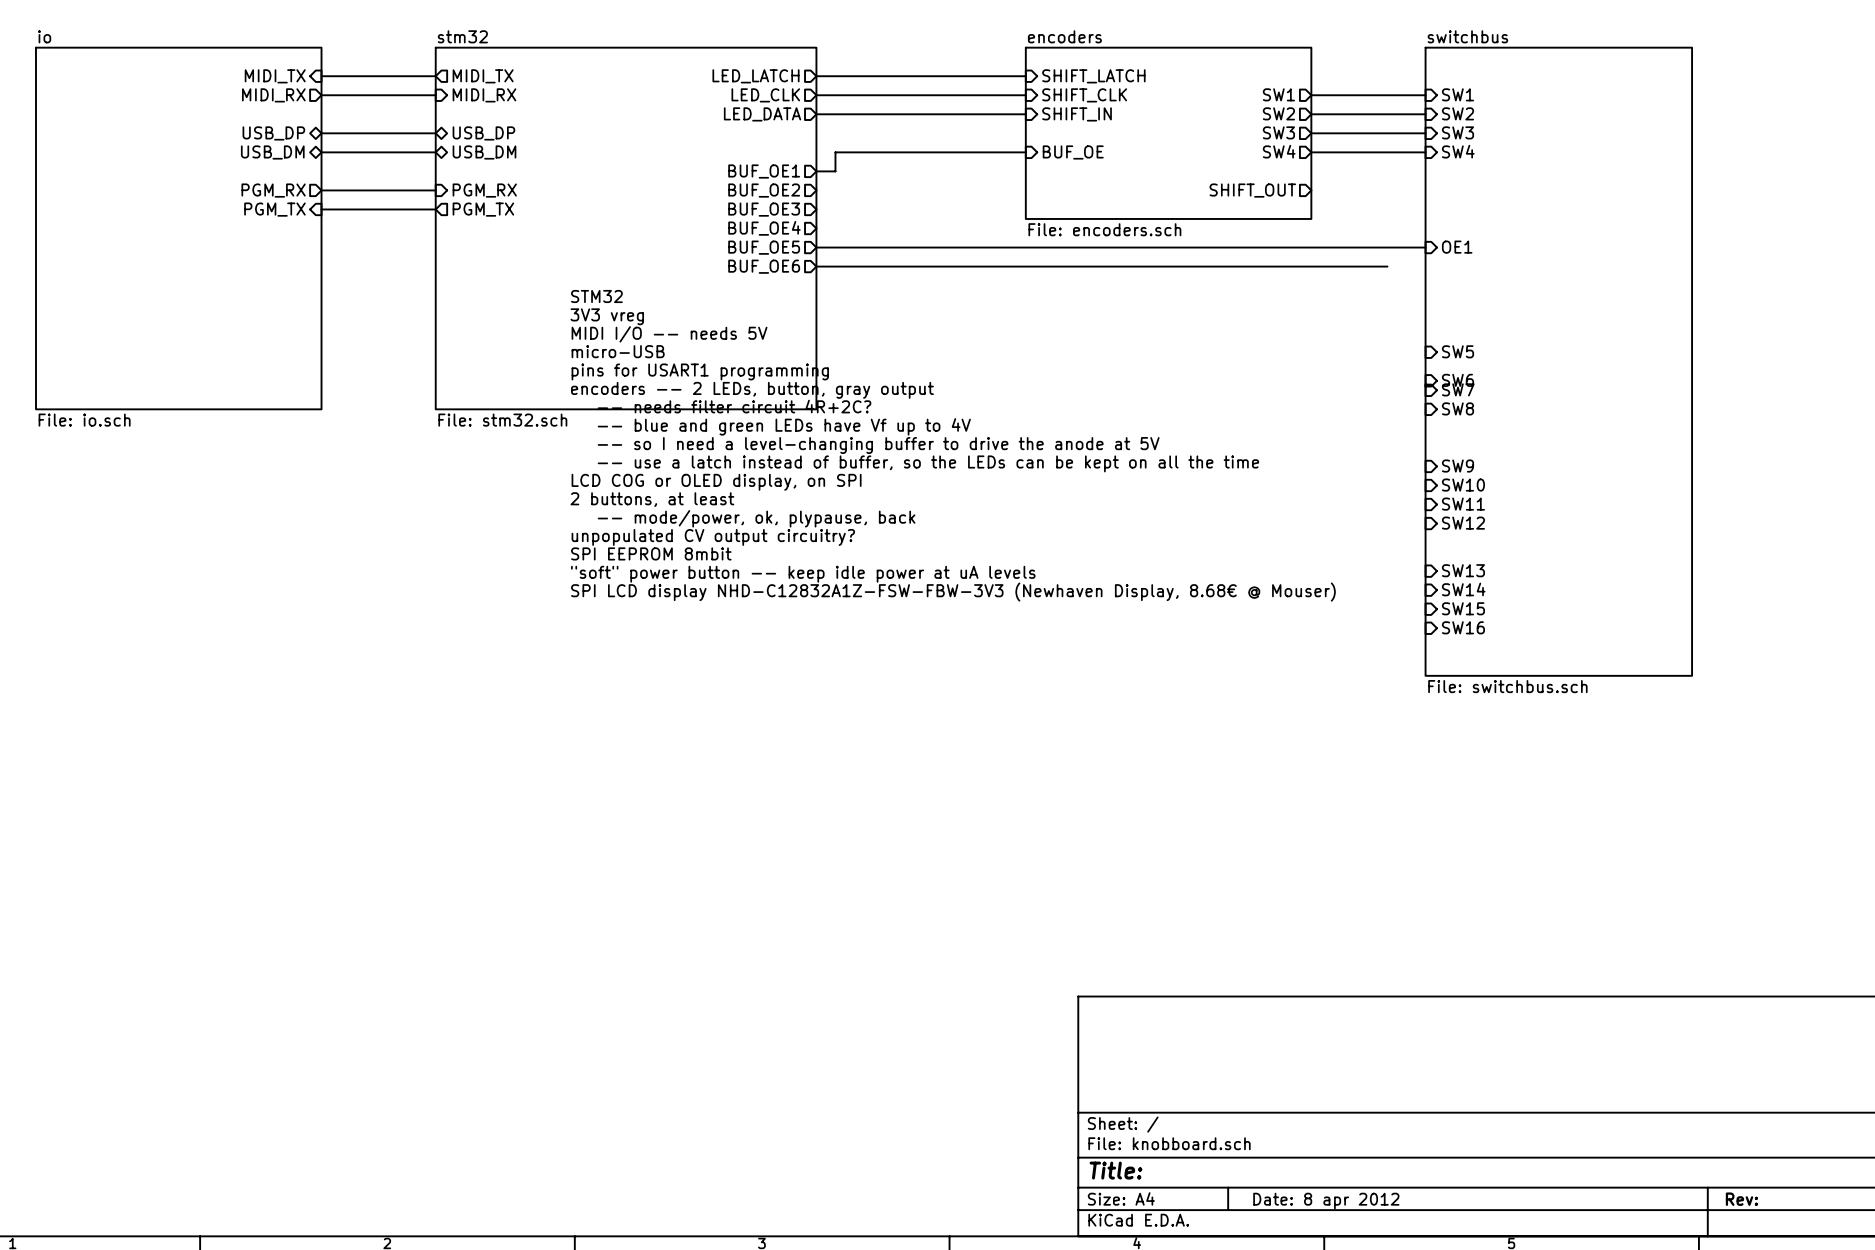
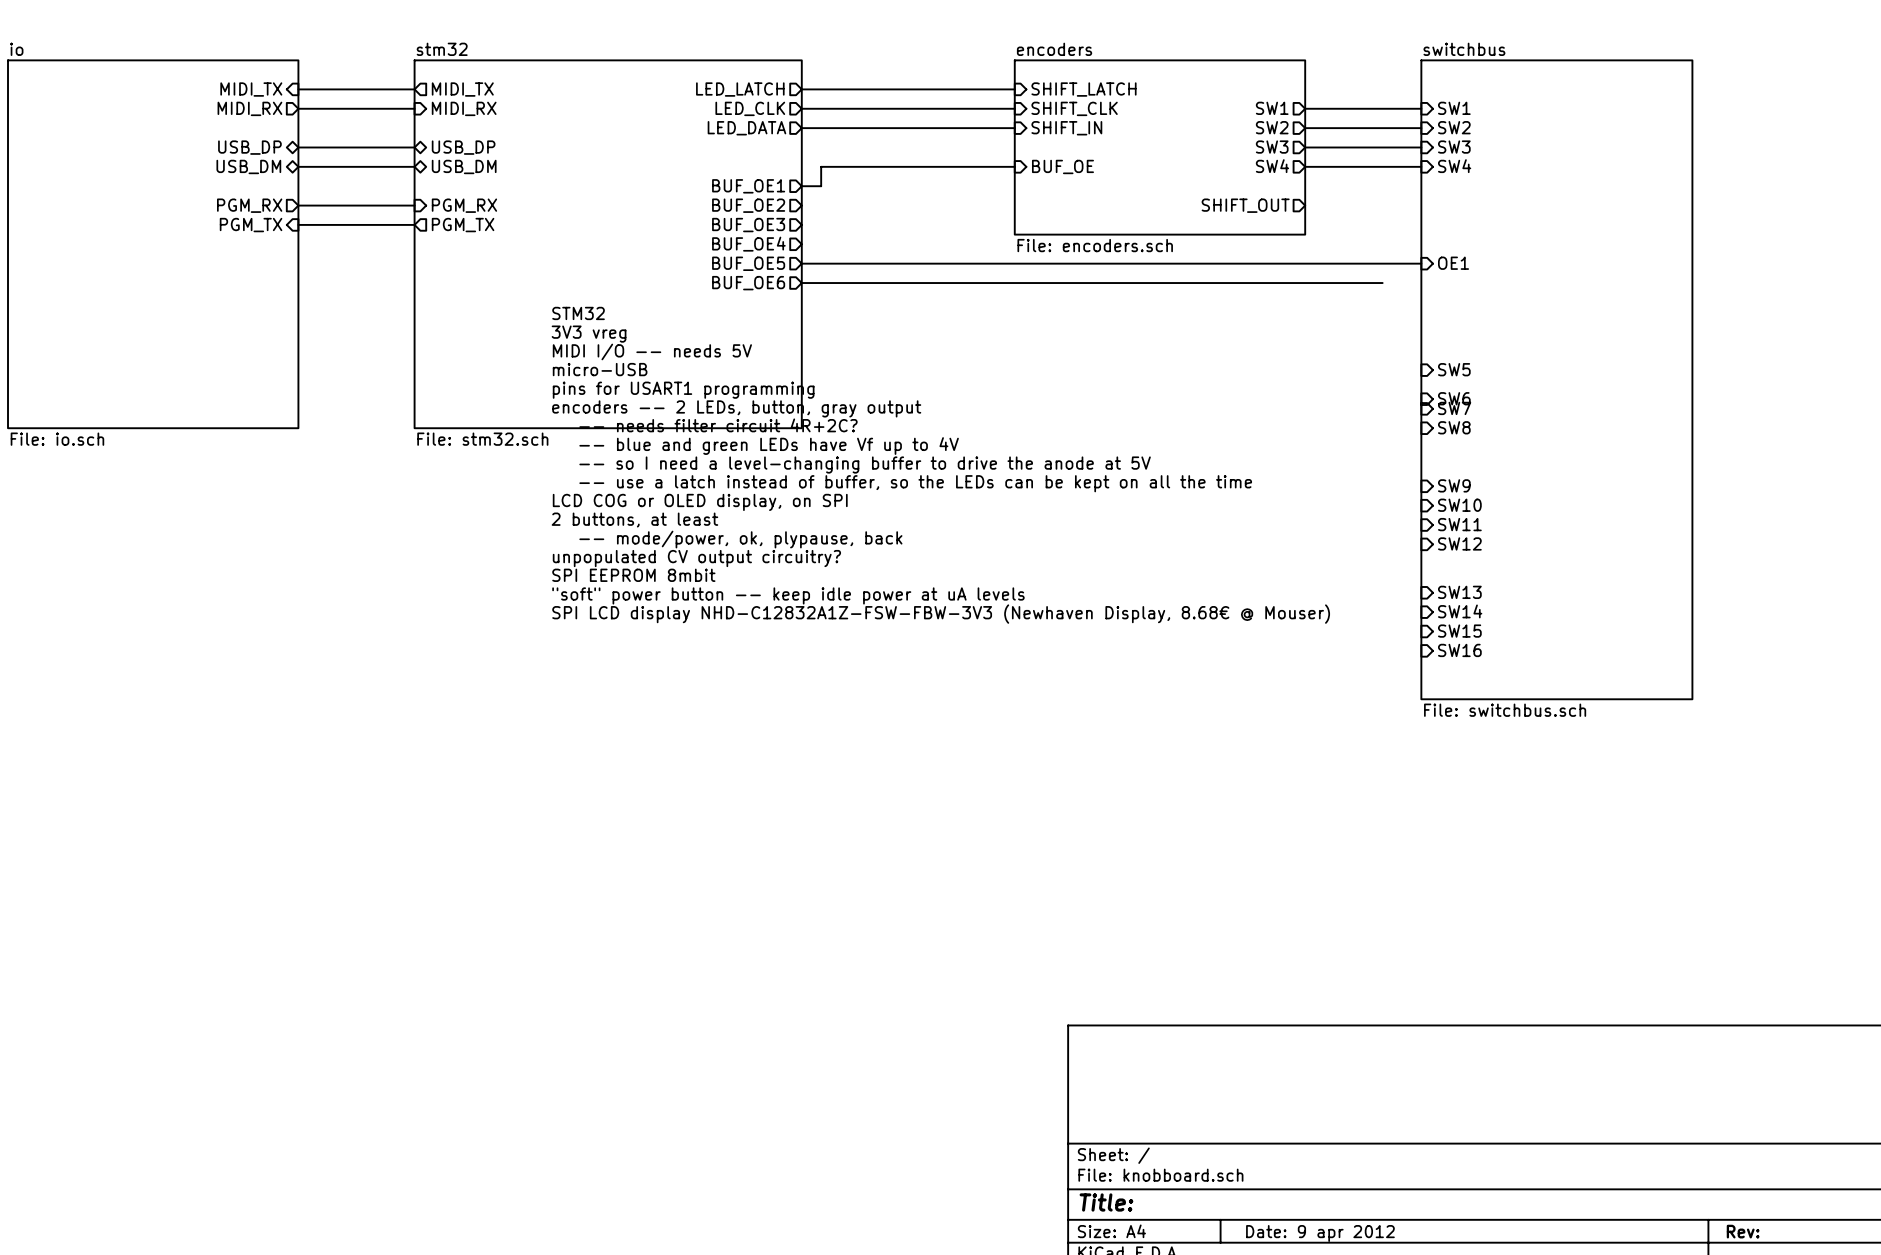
title block: Date: 8 apr 2012 (1326, 1201) -> Date: 9 apr 2012 (1320, 1233)

